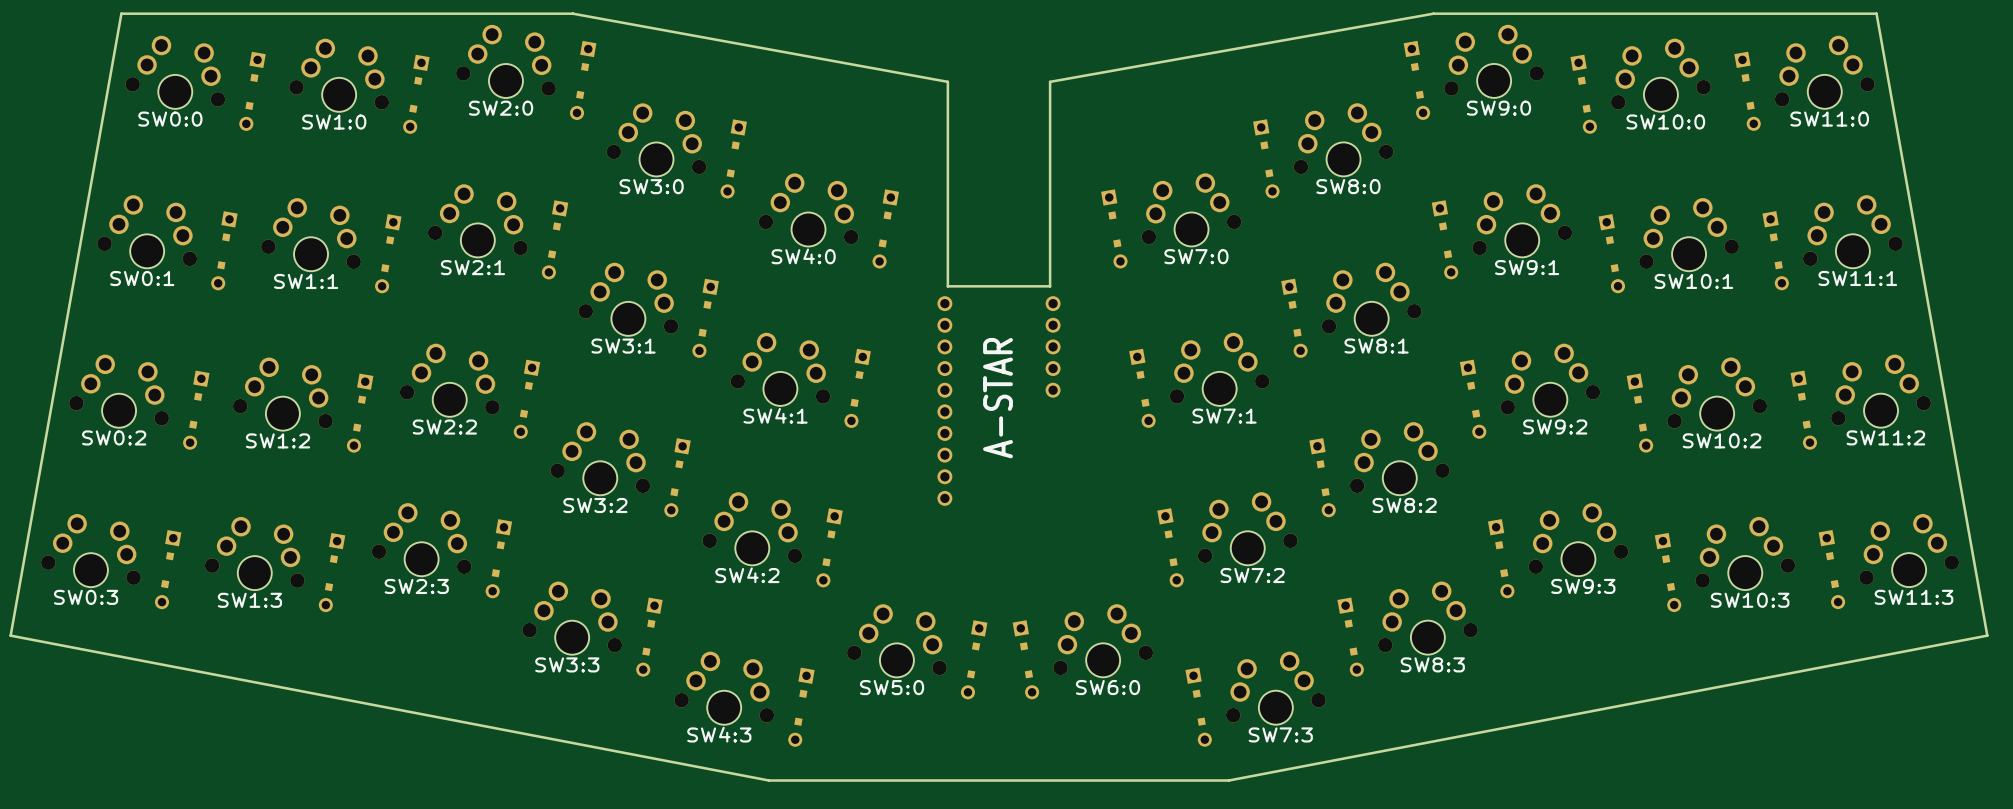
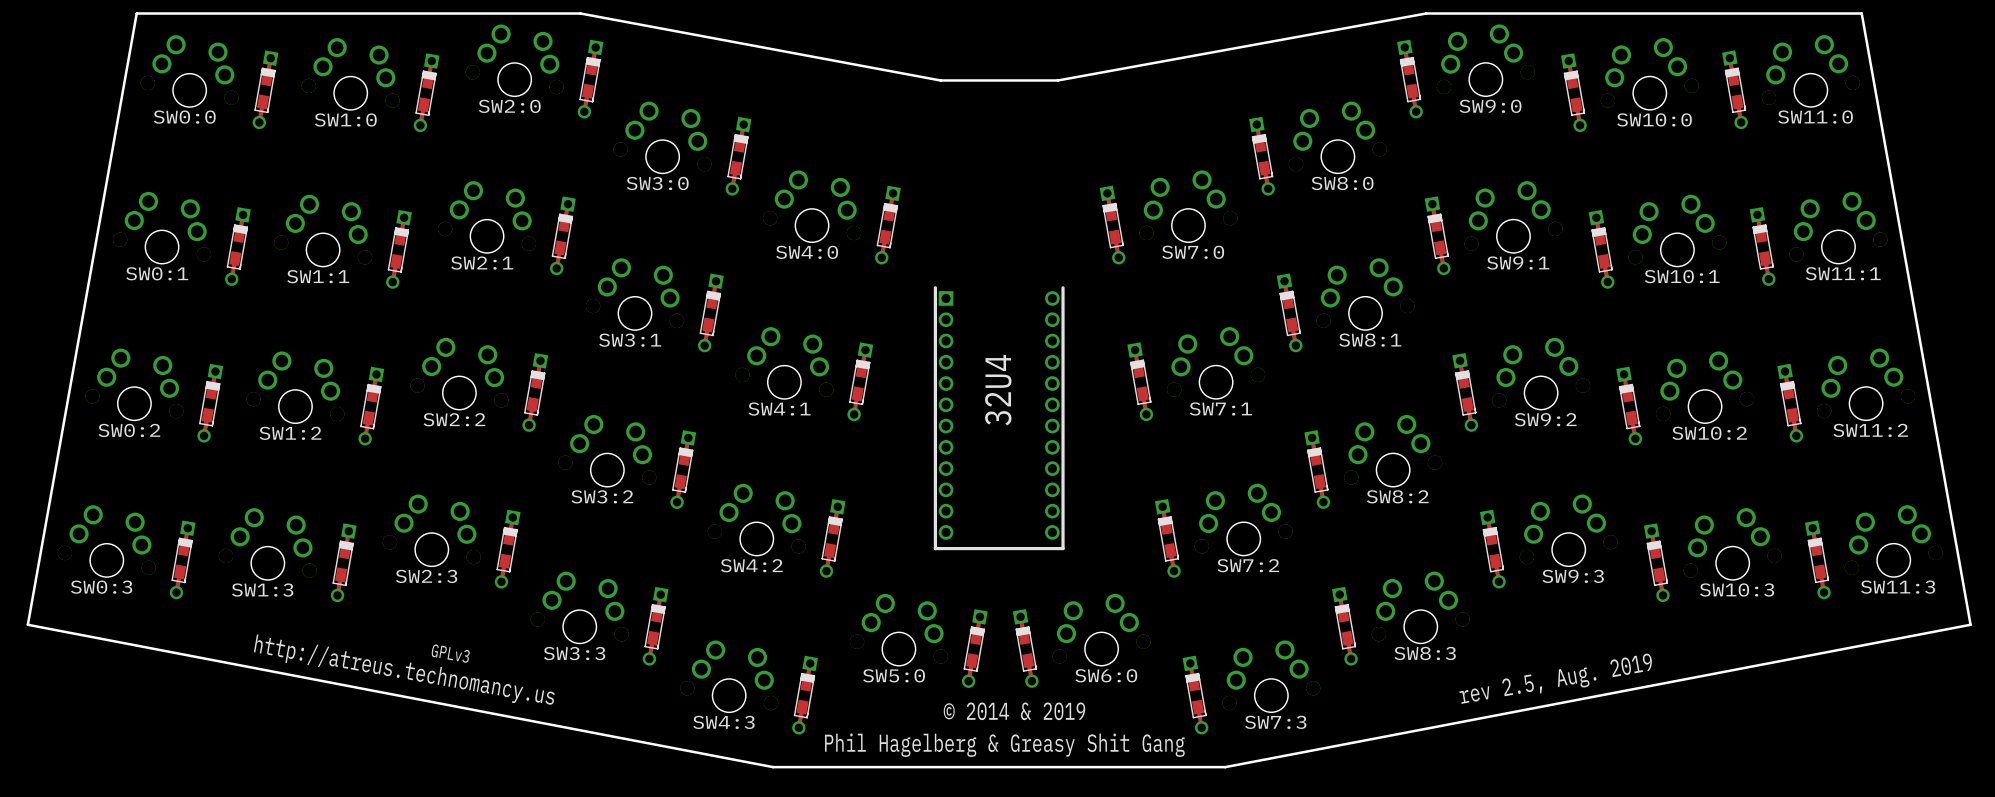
board edge: (572, 13) (947, 81) (947, 286) (1050, 286) (1050, 81) (1433, 13) -> (580, 13) (940, 80) (1057, 80) (1426, 13)
part footprint: [569, 40, 597, 120] -> [577, 39, 604, 119]
part footprint: [1403, 40, 1431, 120] -> [1397, 39, 1423, 119]
part footprint: [239, 51, 266, 131] -> [252, 50, 279, 130]
part footprint: [1734, 51, 1761, 131] -> [1722, 50, 1748, 130]
part footprint: [403, 54, 430, 134] -> [413, 53, 440, 133]
part footprint: [1570, 54, 1597, 134] -> [1561, 53, 1587, 133]
part footprint: [720, 119, 747, 199] -> [725, 116, 752, 196]
part footprint: [1253, 119, 1280, 199] -> [1249, 116, 1275, 196]
part footprint: [872, 189, 899, 269] -> [875, 185, 901, 265]
part footprint: [1101, 189, 1128, 269] -> [1099, 185, 1126, 265]
part footprint: [541, 200, 569, 280] -> [550, 196, 576, 276]
part footprint: [1431, 200, 1459, 280] -> [1424, 196, 1451, 276]
part footprint: [211, 211, 238, 291] -> [225, 207, 251, 286]
part footprint: [1762, 211, 1789, 291] -> [1749, 207, 1776, 286]
part footprint: [375, 214, 402, 294] -> [386, 210, 412, 289]
part footprint: [1598, 214, 1626, 294] -> [1588, 209, 1615, 289]
part footprint: [692, 278, 719, 358] -> [697, 273, 724, 353]
part footprint: [1281, 278, 1308, 358] -> [1276, 273, 1303, 353]
part footprint: [844, 348, 871, 428] -> [847, 342, 874, 422]
part footprint: [1129, 348, 1156, 428] -> [1127, 342, 1154, 422]
part footprint: [513, 359, 541, 439] -> [522, 353, 549, 432]
part footprint: [1459, 359, 1487, 439] -> [1452, 353, 1479, 432]
part footprint: [183, 370, 210, 450] -> [197, 363, 224, 443]
part footprint: [1790, 370, 1818, 450] -> [1777, 363, 1804, 443]
part footprint: [346, 373, 374, 453] -> [358, 366, 385, 446]
part footprint: [1626, 373, 1654, 453] -> [1616, 366, 1643, 446]
part: A-STAR (998, 401) -> none
part: none -> 32U4 (999, 418)
part footprint: [664, 438, 691, 518] -> [670, 430, 697, 509]
part footprint: [1309, 438, 1336, 518] -> [1304, 430, 1331, 509]
part footprint: [816, 508, 843, 588] -> [819, 499, 846, 578]
part footprint: [1157, 508, 1184, 588] -> [1154, 498, 1181, 578]
part footprint: [485, 519, 513, 599] -> [494, 509, 521, 589]
part footprint: [1487, 519, 1515, 599] -> [1479, 509, 1506, 589]
part footprint: [1818, 529, 1846, 610] -> [1804, 520, 1831, 600]
part footprint: [154, 530, 182, 610] -> [169, 520, 196, 600]
part footprint: [318, 532, 346, 613] -> [330, 523, 357, 603]
part footprint: [1654, 532, 1682, 613] -> [1643, 523, 1670, 603]
part footprint: [636, 597, 663, 677] -> [642, 586, 669, 666]
part footprint: [1337, 597, 1364, 677] -> [1331, 586, 1358, 666]
part footprint: [960, 620, 988, 700] -> [961, 609, 988, 688]
part footprint: [1012, 620, 1040, 700] -> [1012, 609, 1039, 688]
text: none -> GPLv3 (450, 653)
part footprint: [788, 667, 815, 747] -> [792, 655, 818, 735]
part footprint: [1185, 667, 1212, 747] -> [1182, 655, 1209, 735]
text: none -> http://atreus.technomancy.us (404, 669)
text: none -> rev 2.5, Aug. 2019 (1555, 678)
text: none -> © 2014 & 2019 (1014, 711)
text: none -> Phil Hagelberg & Greasy Shit Gang (1004, 745)

